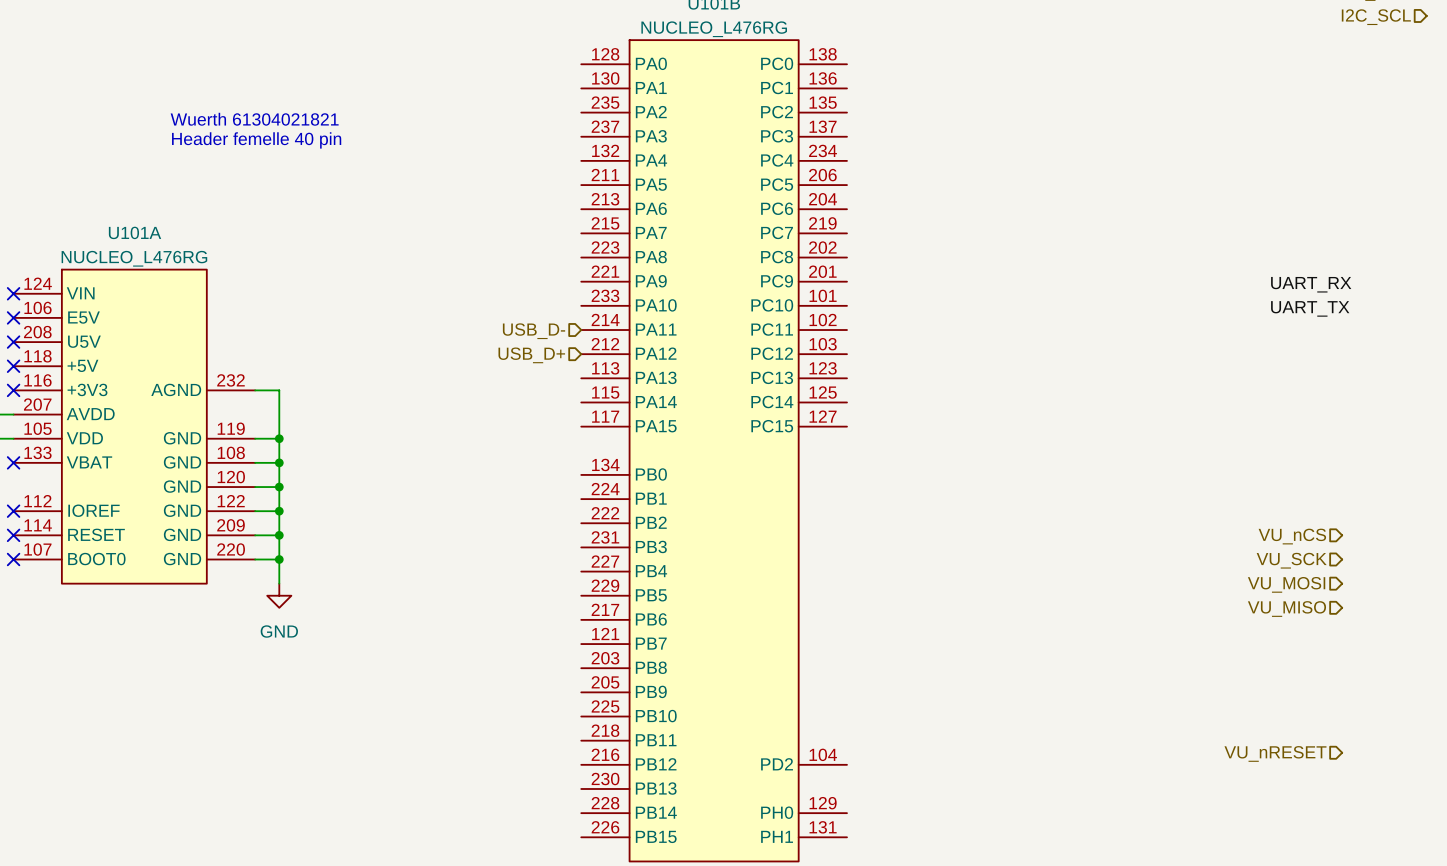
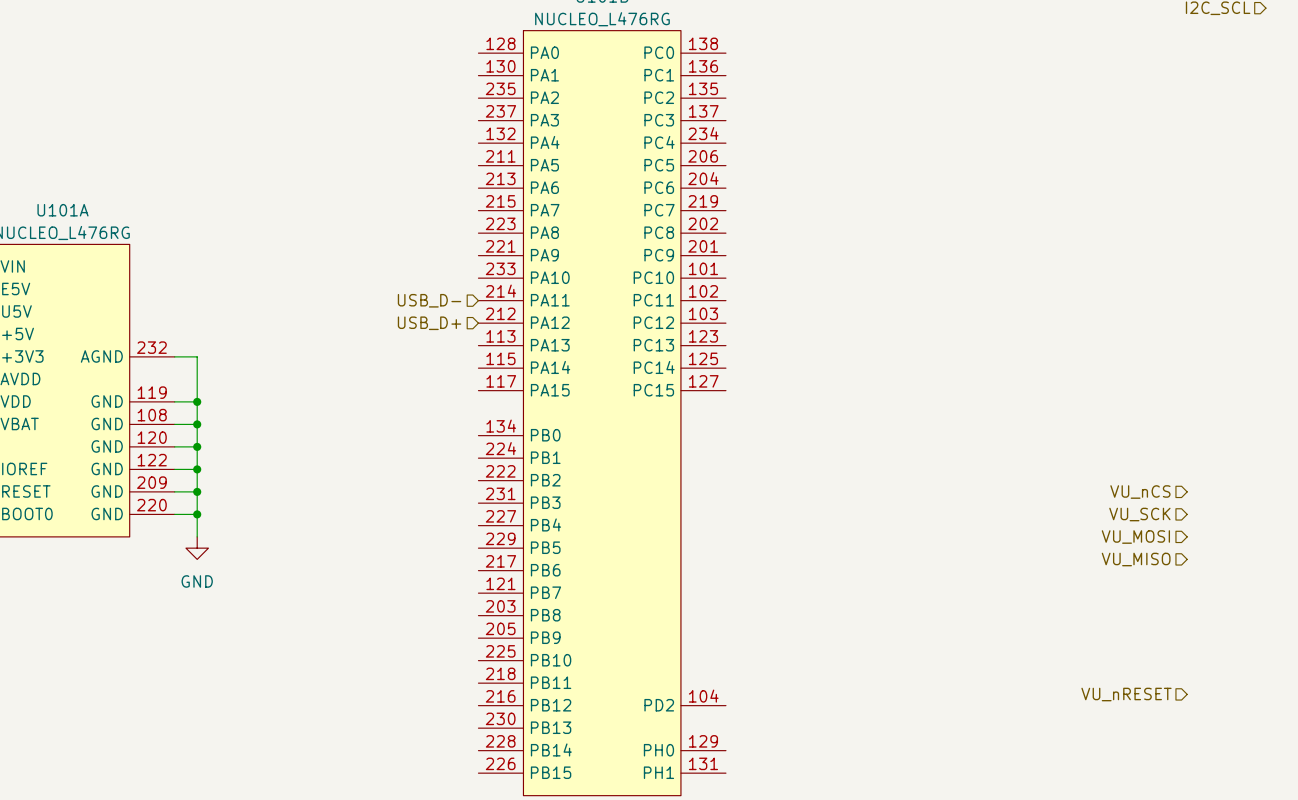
text: Wuerth 61304021821 (254, 119) -> none
text: Header femelle 40 pin (256, 140) -> none
label: UART_RX (1311, 284) -> none
label: UART_TX (1310, 308) -> none

